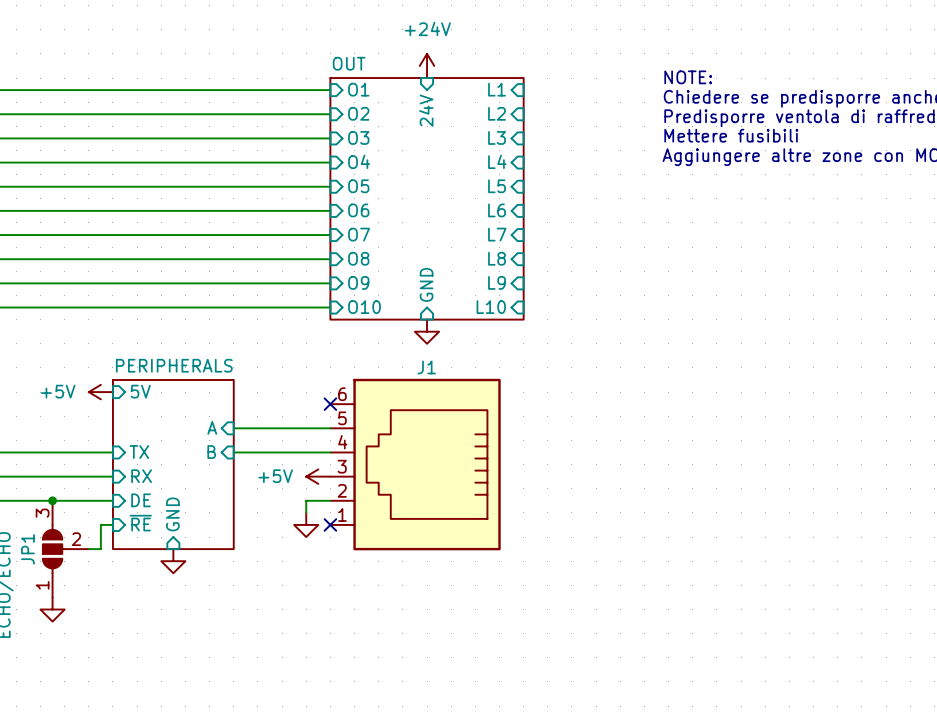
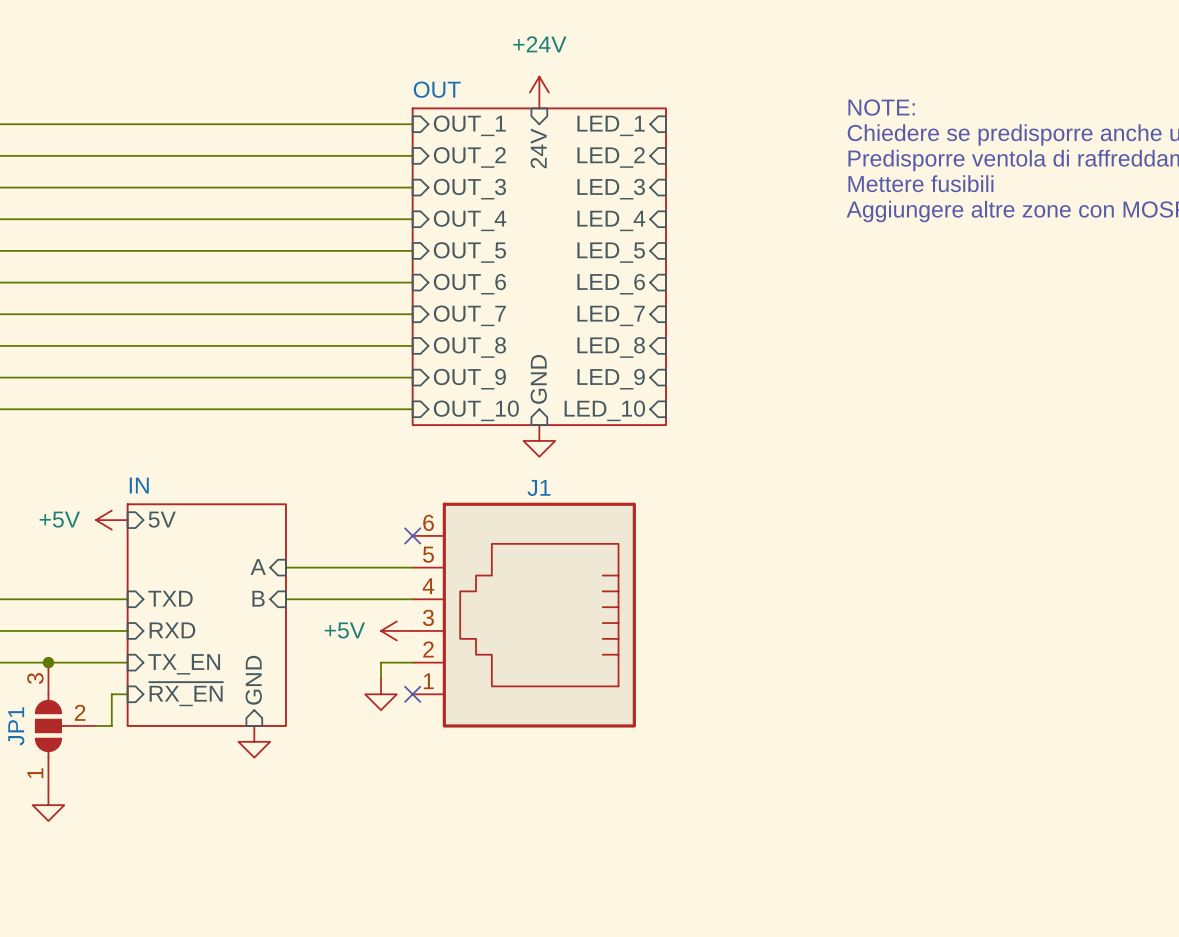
sheet pin: O1 (358, 89) -> OUT_1 (469, 125)
sheet pin: L1 (497, 89) -> LED_1 (611, 125)
sheet pin: O2 (358, 113) -> OUT_2 (469, 157)
sheet pin: L2 (497, 113) -> LED_2 (611, 157)
sheet pin: O3 (358, 137) -> OUT_3 (469, 189)
sheet pin: L3 (497, 137) -> LED_3 (611, 189)
sheet pin: O4 (359, 161) -> OUT_4 (470, 220)
sheet pin: L4 (497, 161) -> LED_4 (611, 220)
sheet pin: O5 (358, 186) -> OUT_5 (469, 252)
sheet pin: L5 (497, 186) -> LED_5 (611, 252)
sheet pin: O6 (358, 210) -> OUT_6 (469, 284)
sheet pin: L6 (497, 210) -> LED_6 (611, 284)
sheet pin: O7 (359, 234) -> OUT_7 (469, 315)
sheet pin: L7 (497, 234) -> LED_7 (611, 315)
sheet pin: O8 (358, 258) -> OUT_8 (469, 347)
sheet pin: L8 (497, 258) -> LED_8 (611, 347)
sheet pin: O9 (358, 282) -> OUT_9 (469, 379)
sheet pin: L9 (497, 282) -> LED_9 (611, 379)
sheet pin: O10 (364, 307) -> OUT_10 (476, 410)
sheet pin: L10 (491, 307) -> LED_10 (604, 410)
sheet PERIPHERALS name: PERIPHERALS (174, 365) -> IN (139, 485)
sheet pin: TX (139, 452) -> TXD (170, 598)
sheet pin: RX (141, 476) -> RXD (172, 630)
sheet pin: DE (141, 500) -> TX_EN (184, 664)
sheet pin position: GND (172, 514) -> GND (253, 680)
sheet pin: ~{RE} (140, 523) -> ~{RX_EN} (186, 694)
power symbol position: (173, 561) -> (254, 741)

